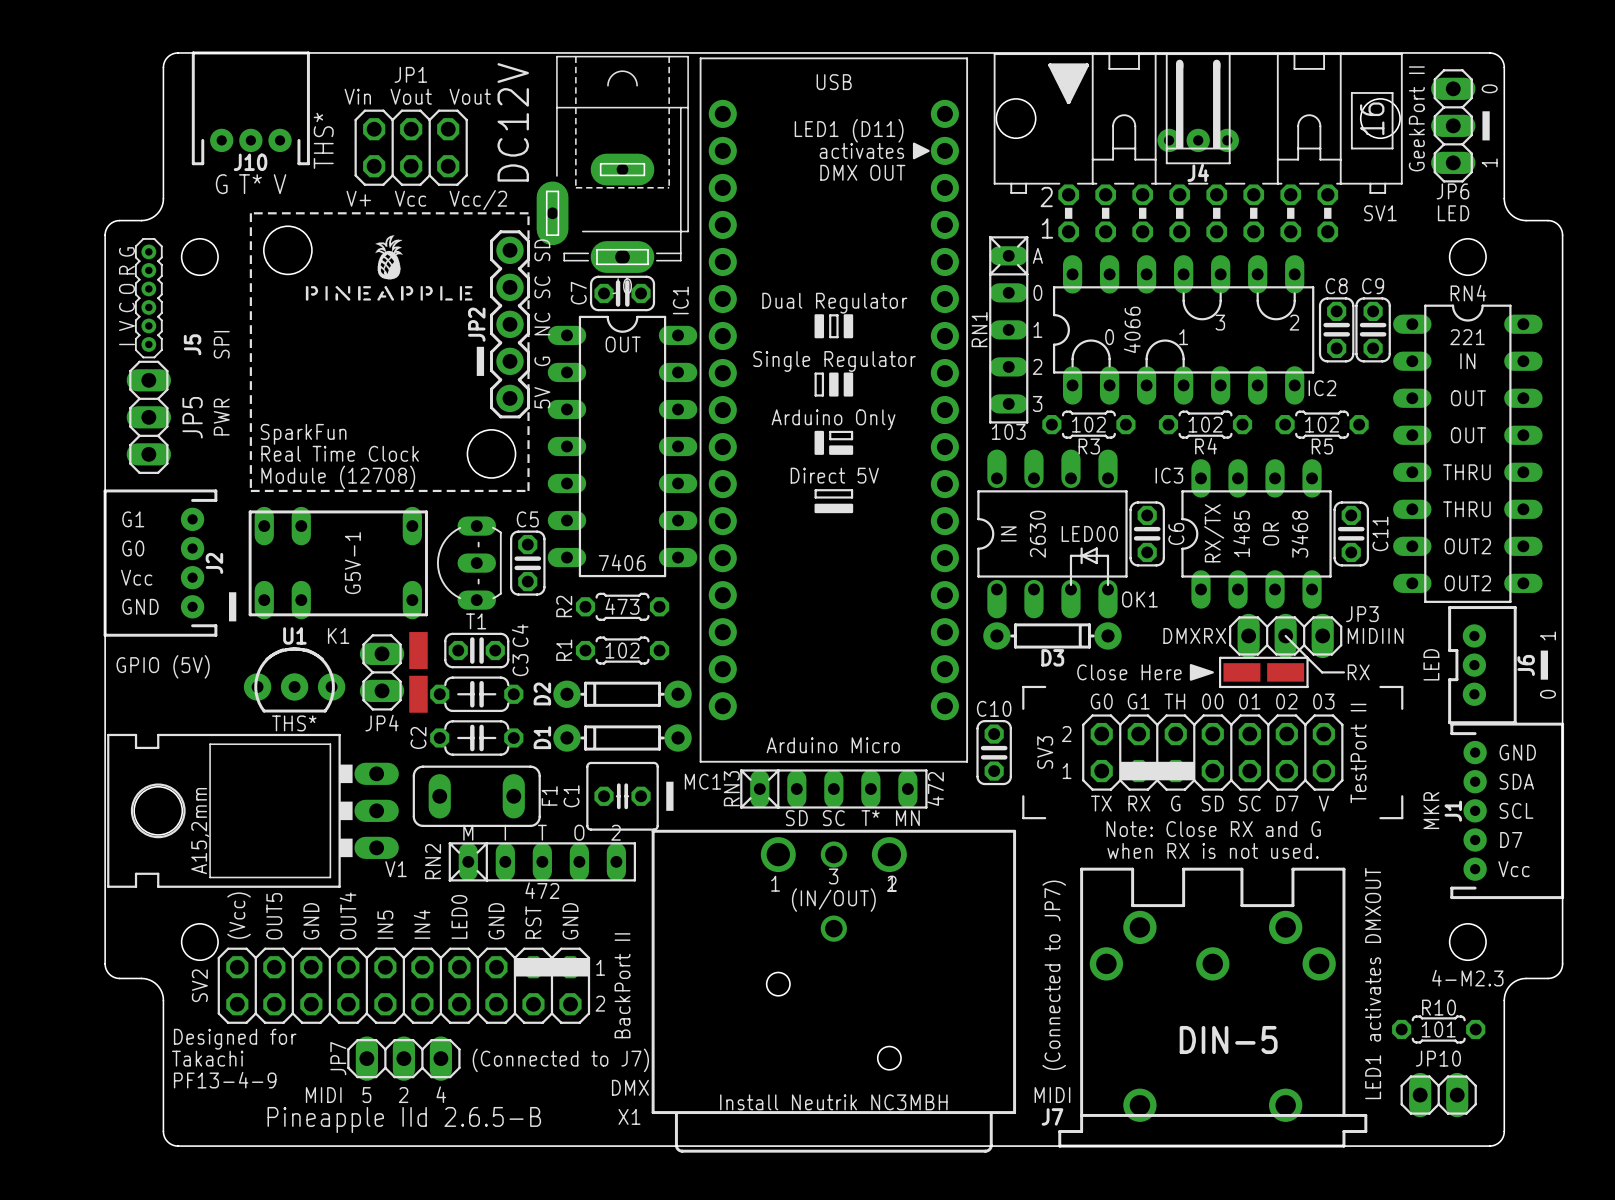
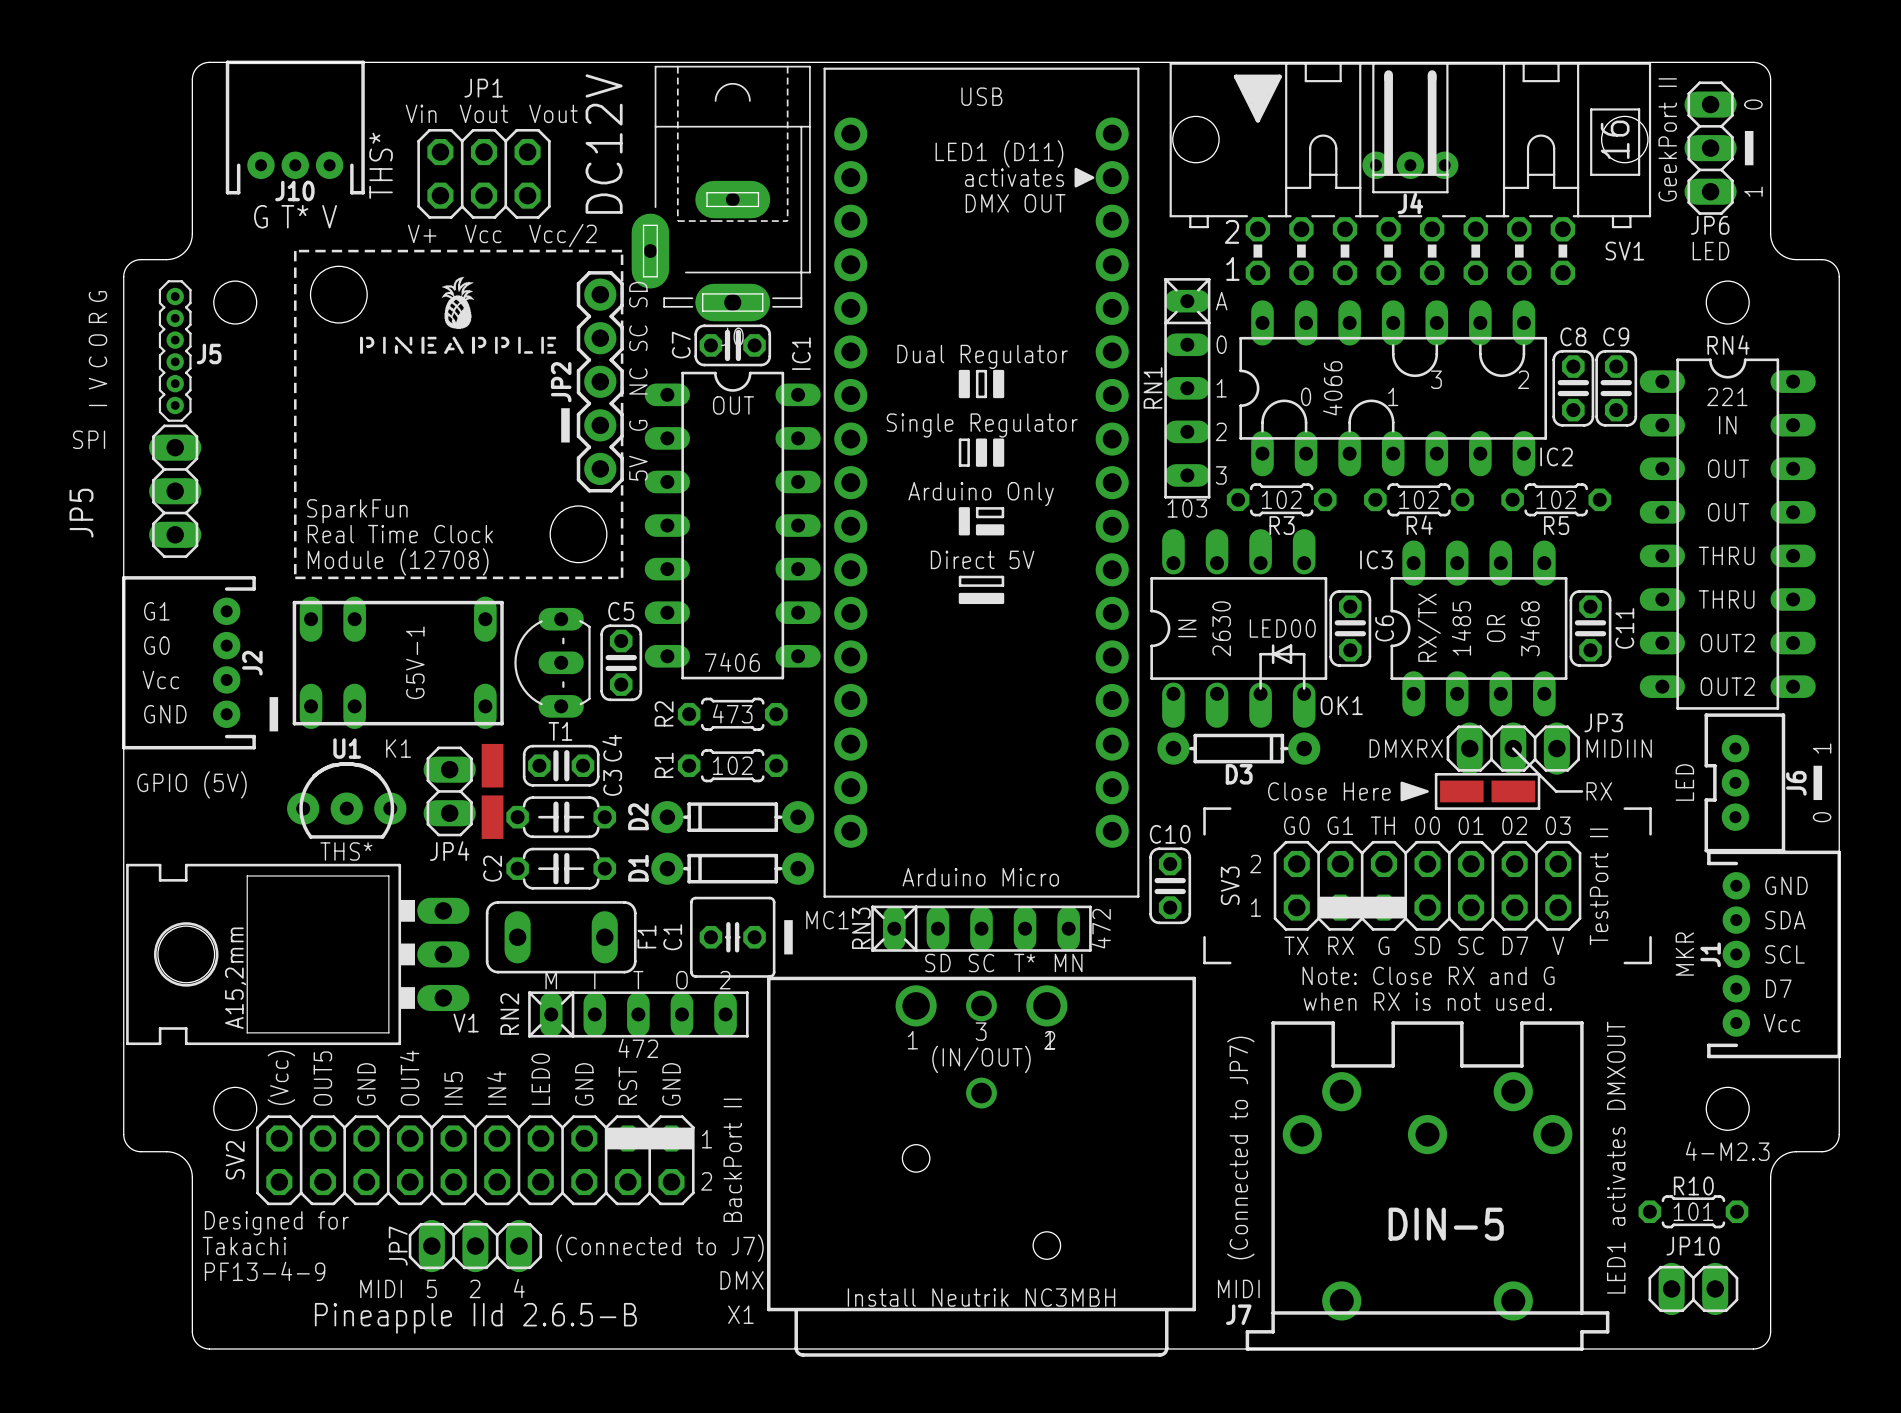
text position: G (126, 251) -> G (98, 296)
text position: R (126, 270) -> R (98, 317)
text position: O (126, 288) -> O (98, 340)
text position: C (126, 307) -> C (98, 361)
text position: V (126, 325) -> V (98, 383)
text position: I (126, 344) -> I (98, 405)
J5 name rotation: 0° (192, 344) -> 90° clockwise (209, 353)
J5 name position: J5 (192, 344) -> J5 (209, 353)
text rotation: 0° (221, 344) -> 90° clockwise (89, 439)
text position: SPI (221, 344) -> SPI (89, 439)
JP5 name position: JP5 (192, 417) -> JP5 (81, 513)
text: PWR (221, 417) -> none

